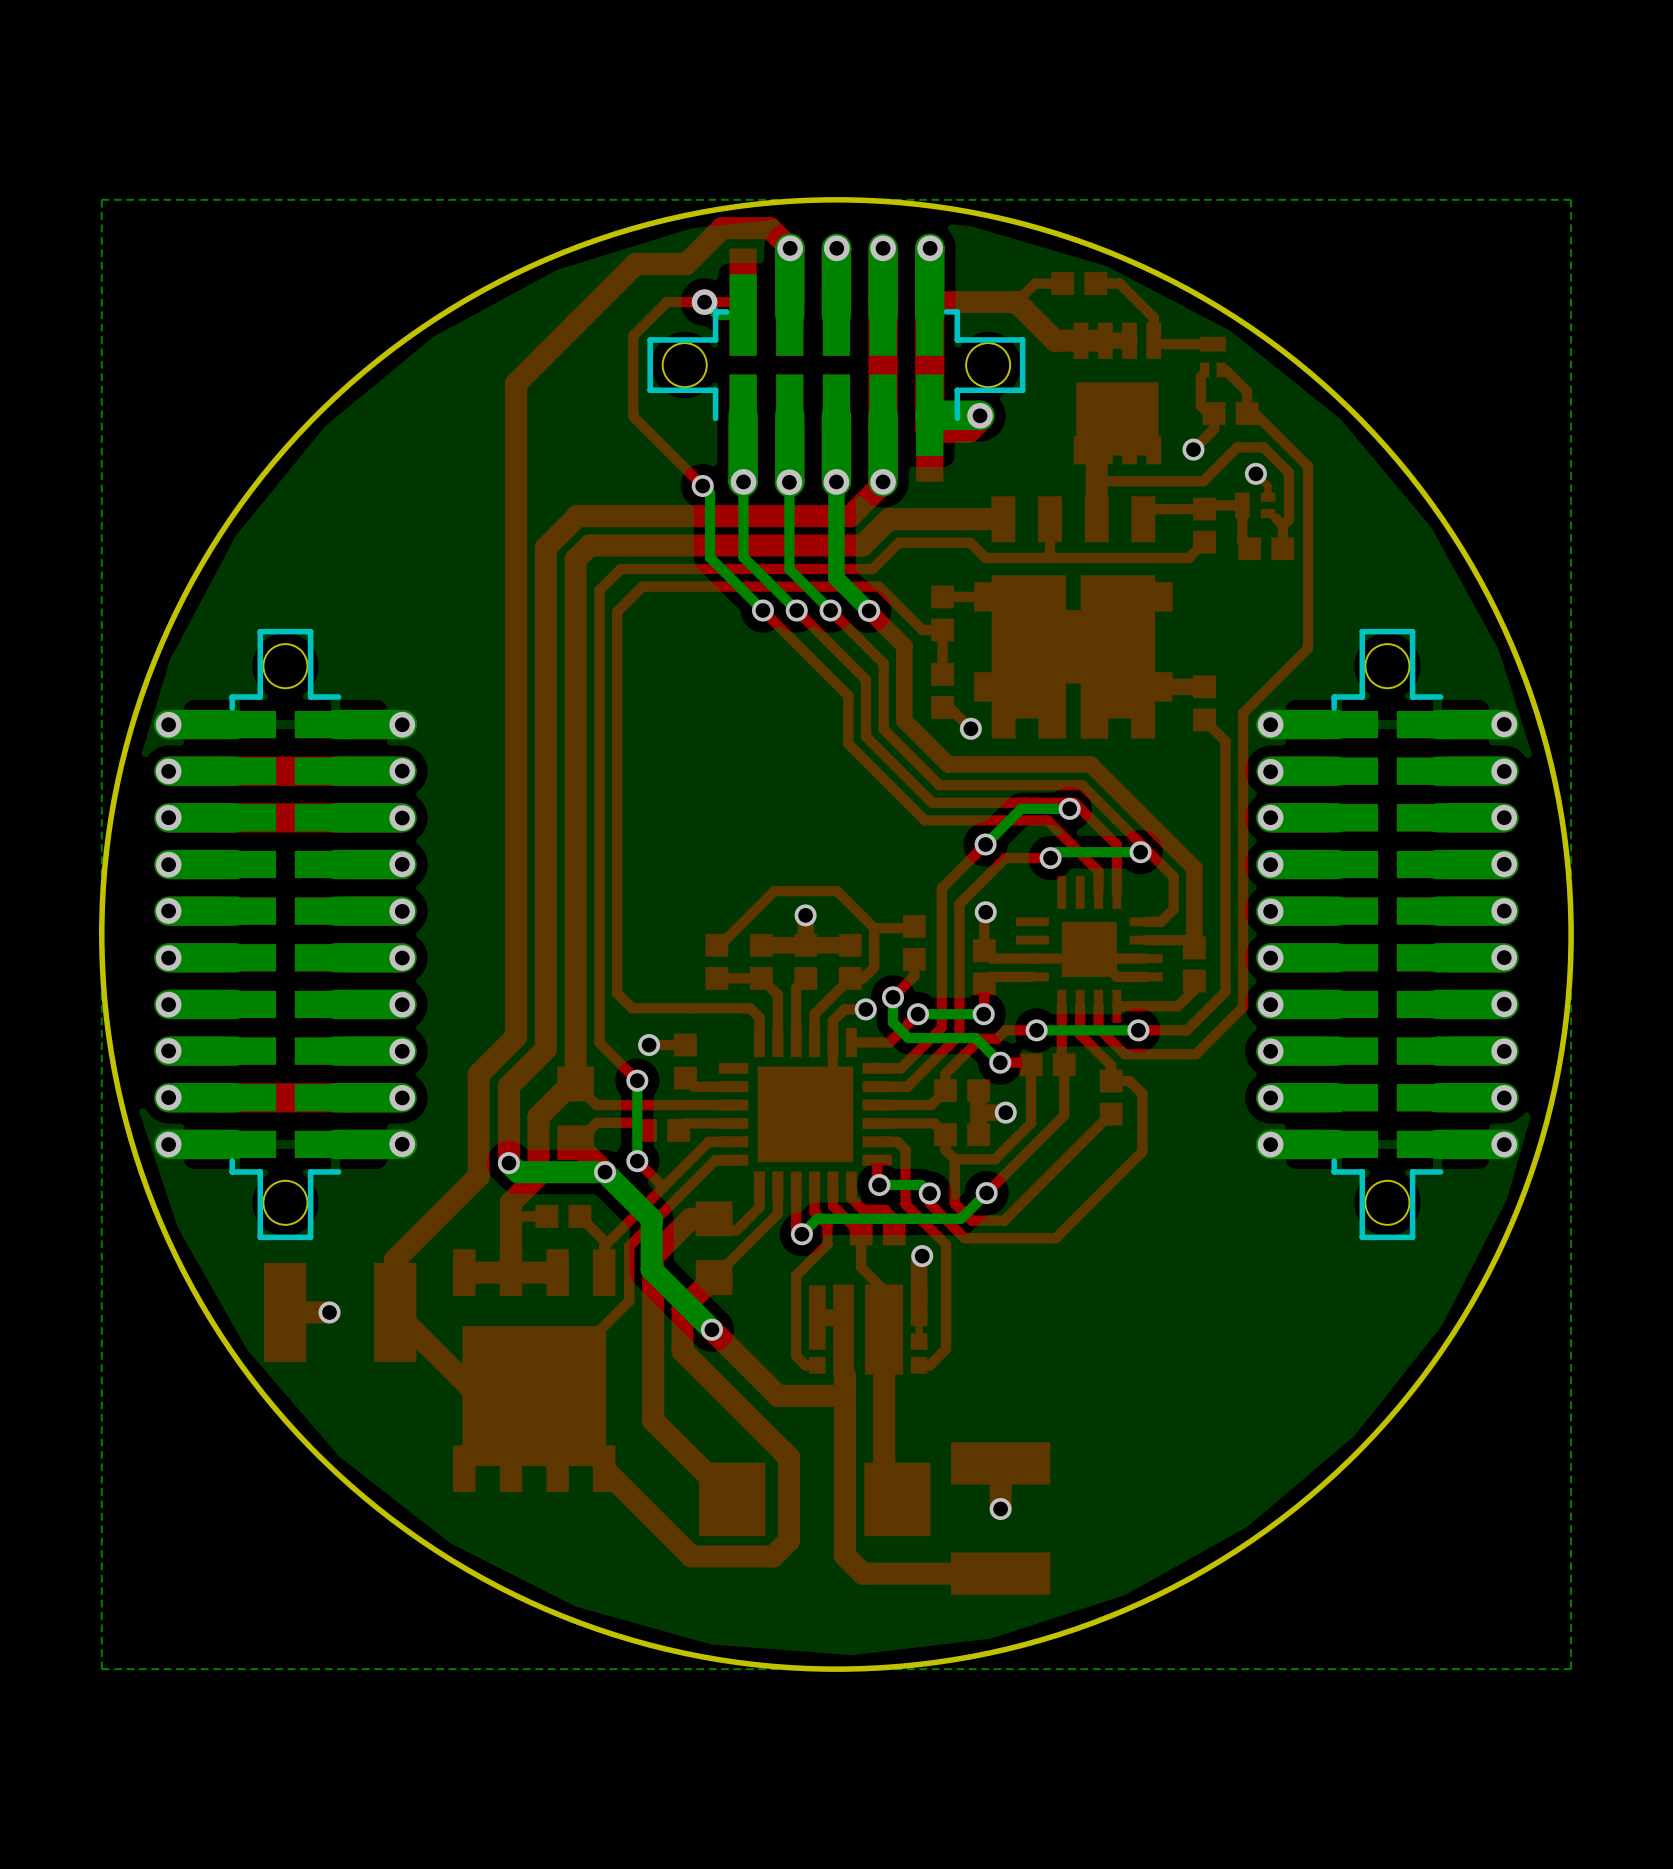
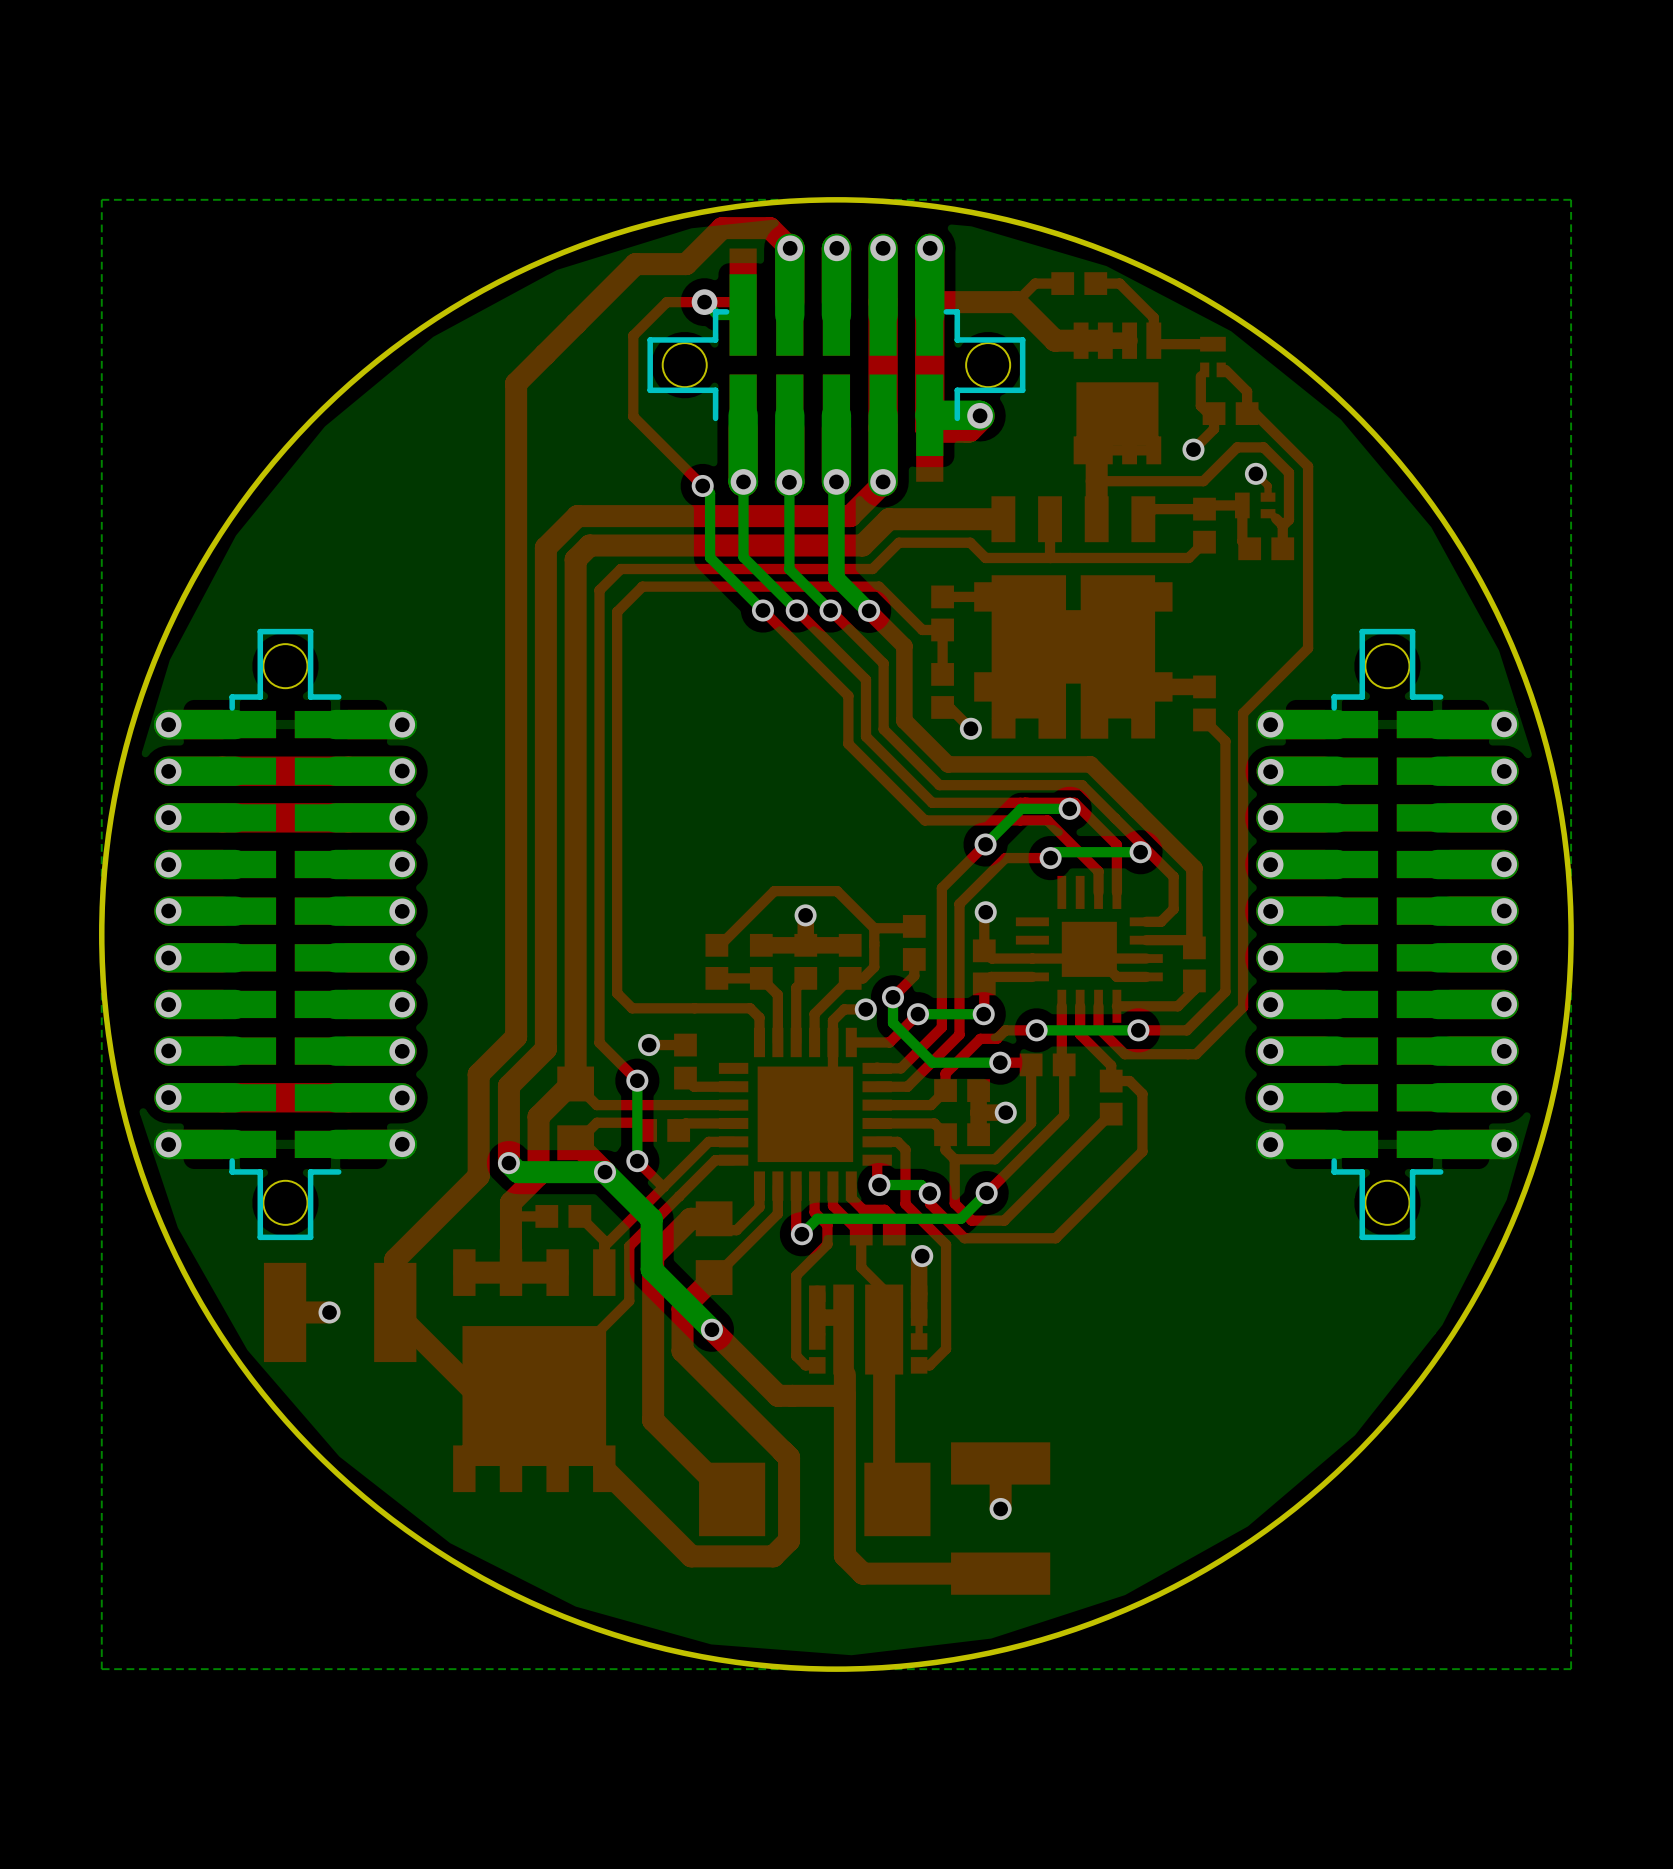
bottom track: (893, 1022) (908, 1038) (975, 1038) (1000, 1062) -> (893, 1023) (932, 1062) (1000, 1062)

